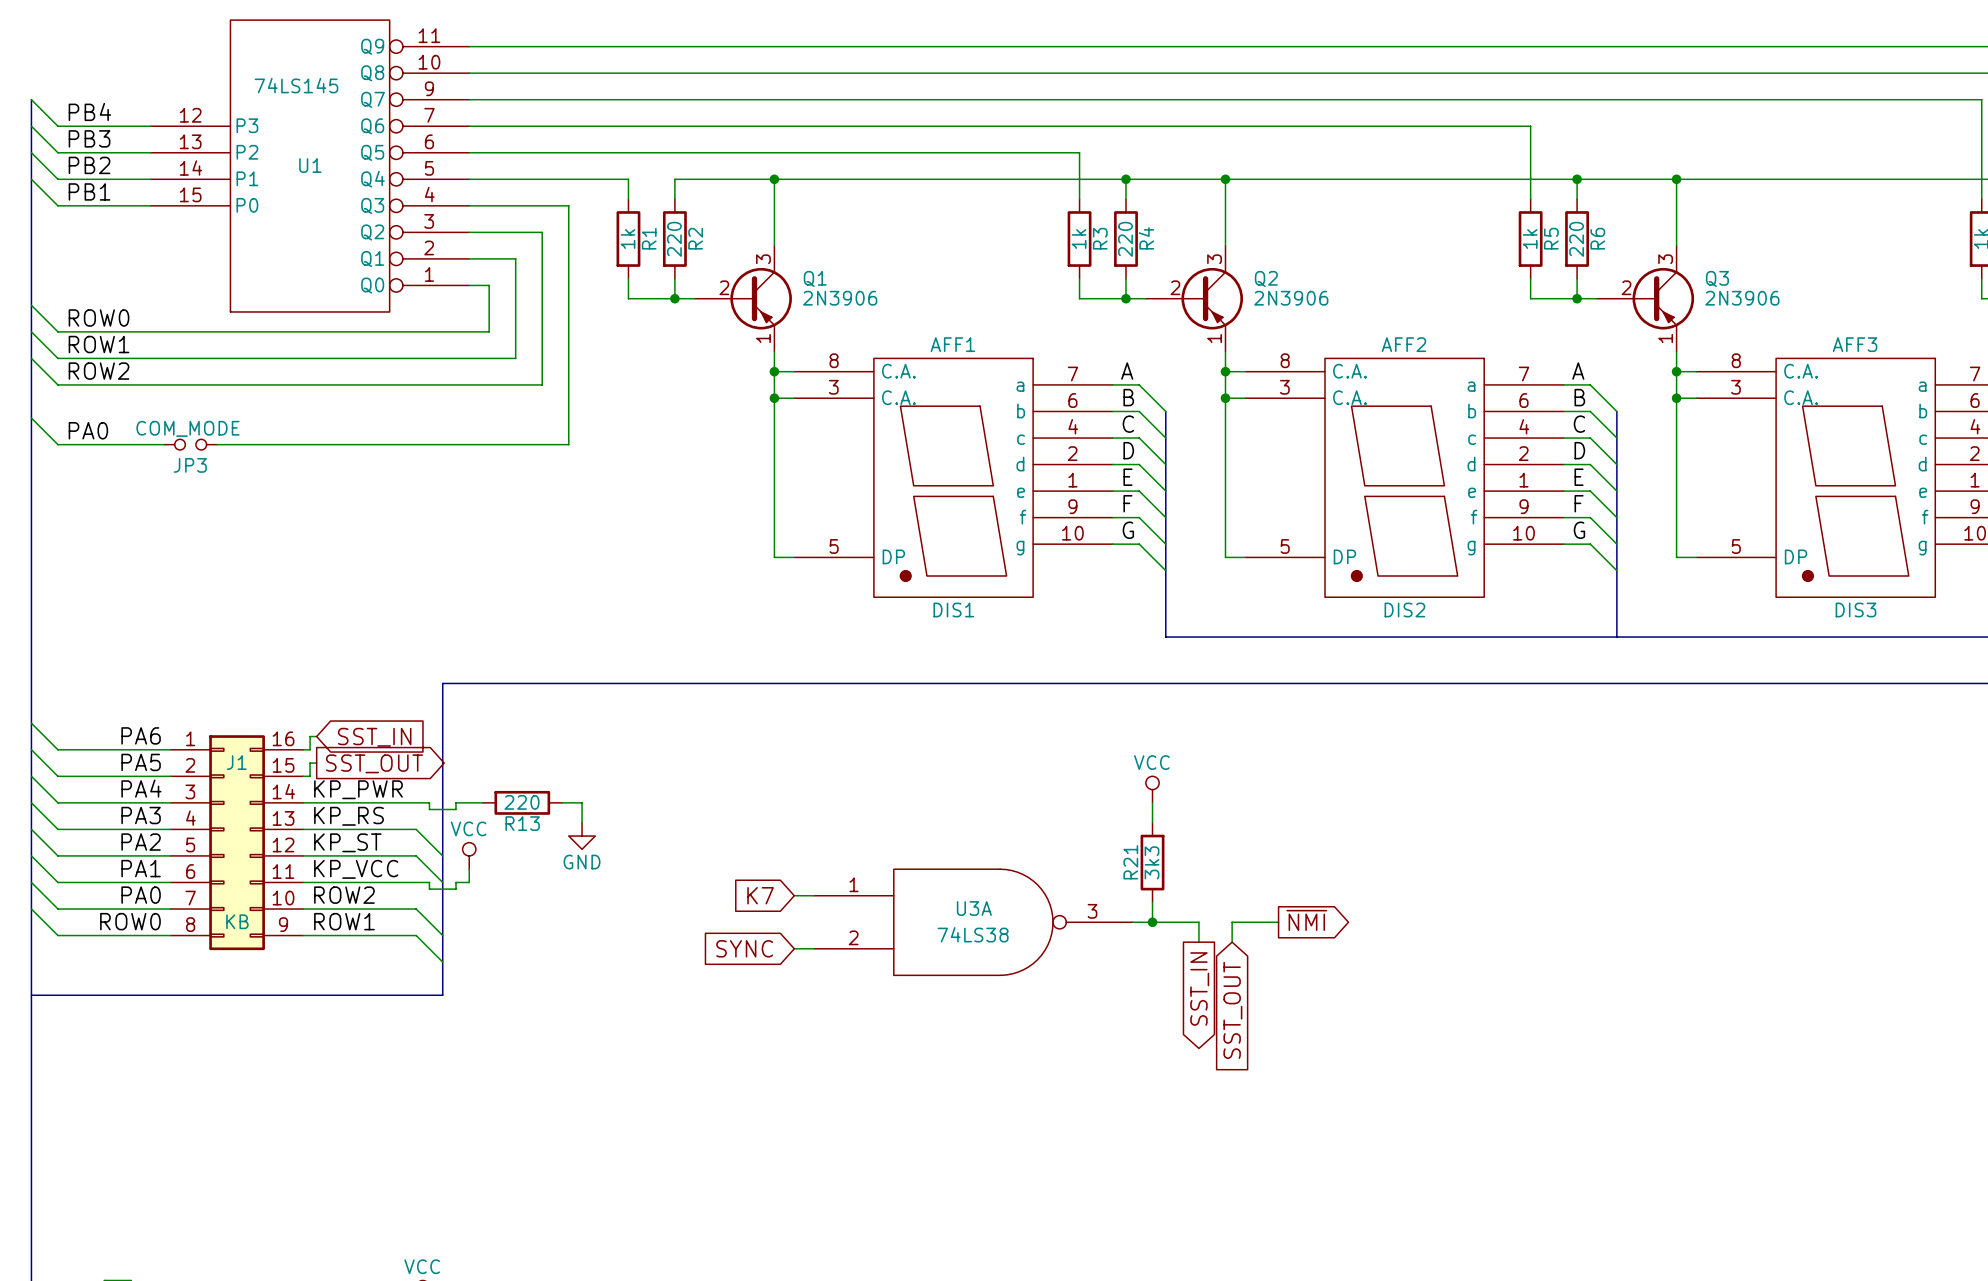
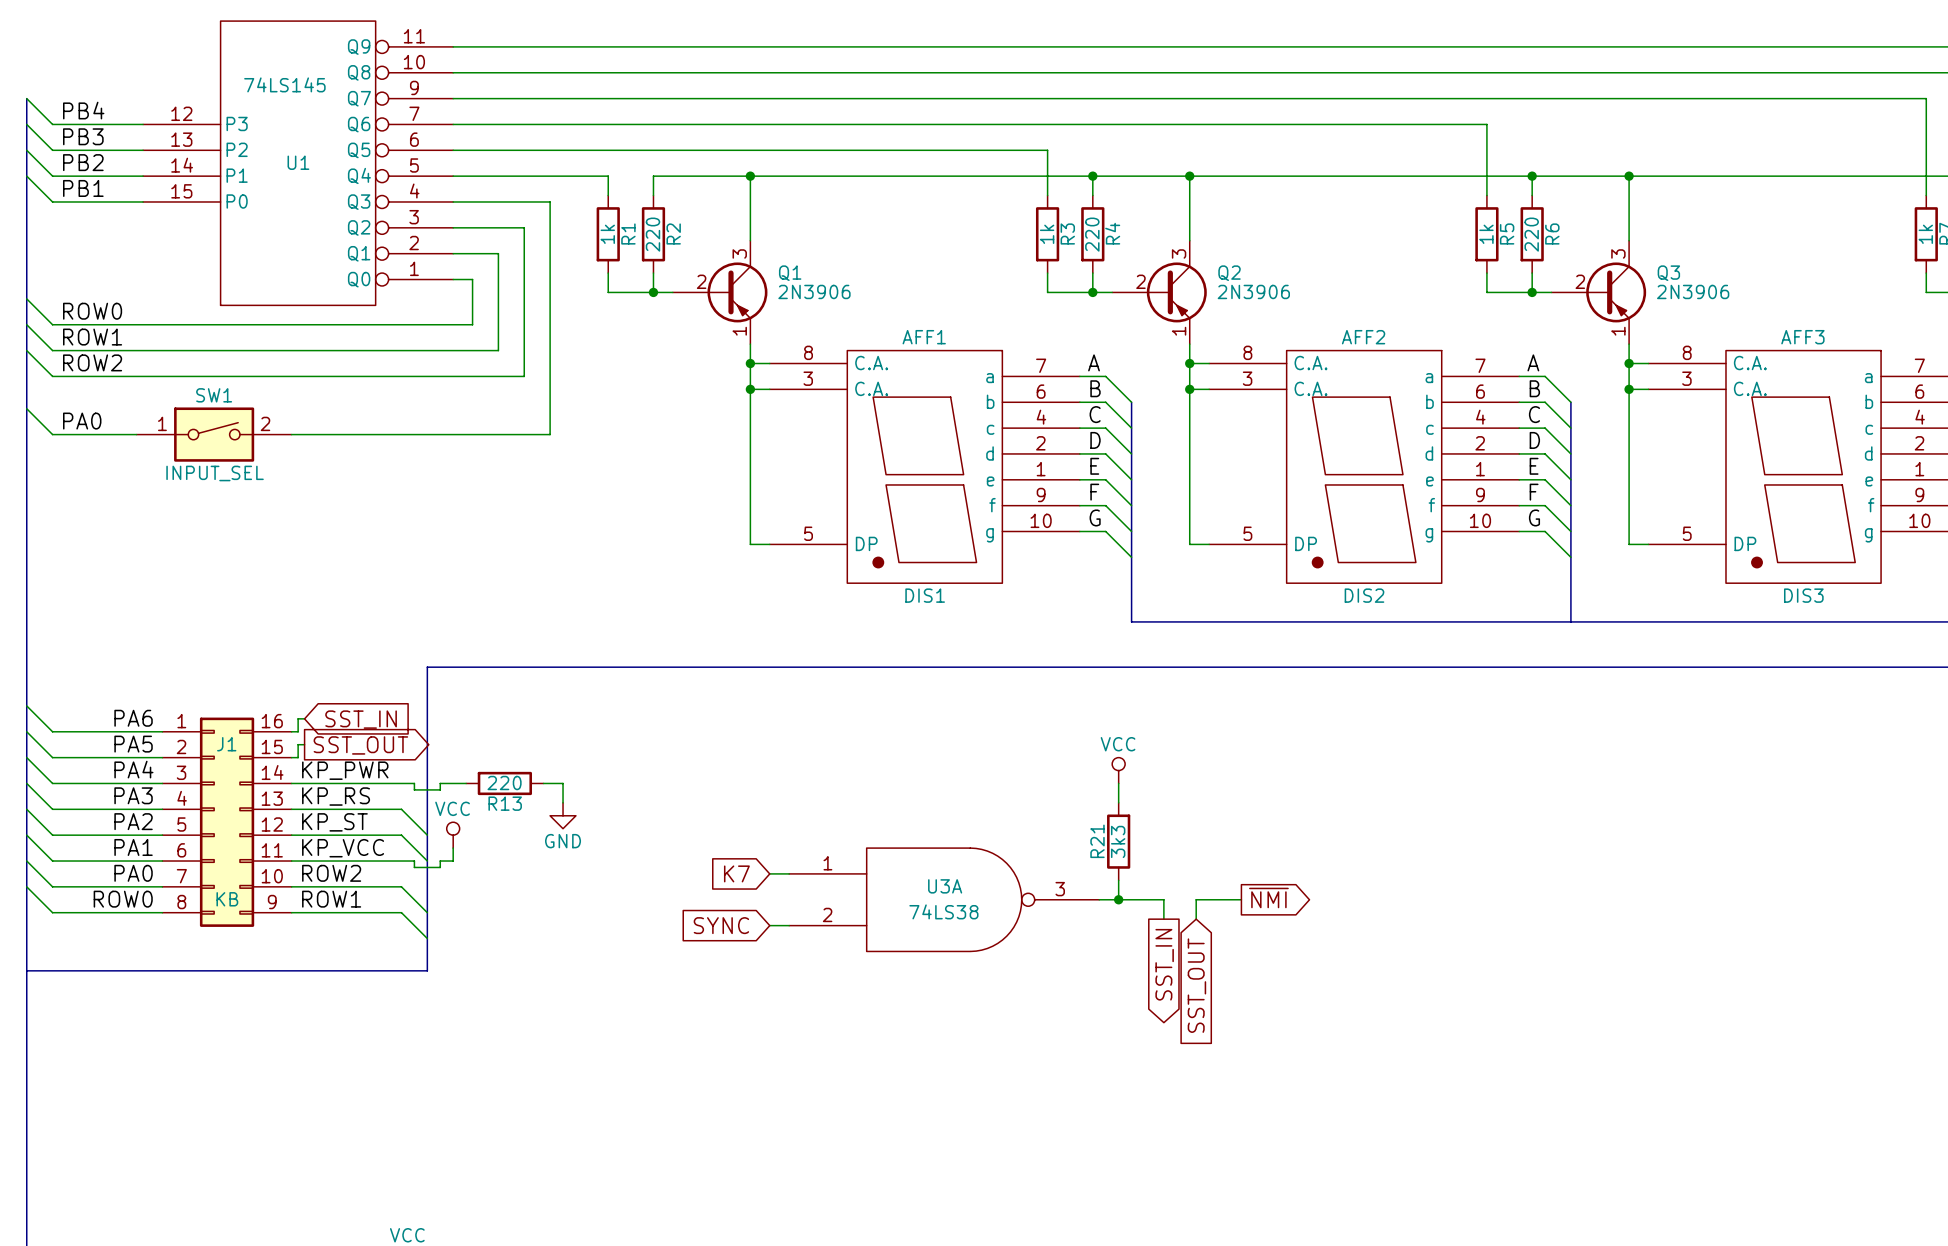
JP3: COM_MODE (190, 444) -> none
SW1: none -> INPUT_SEL (214, 434)

